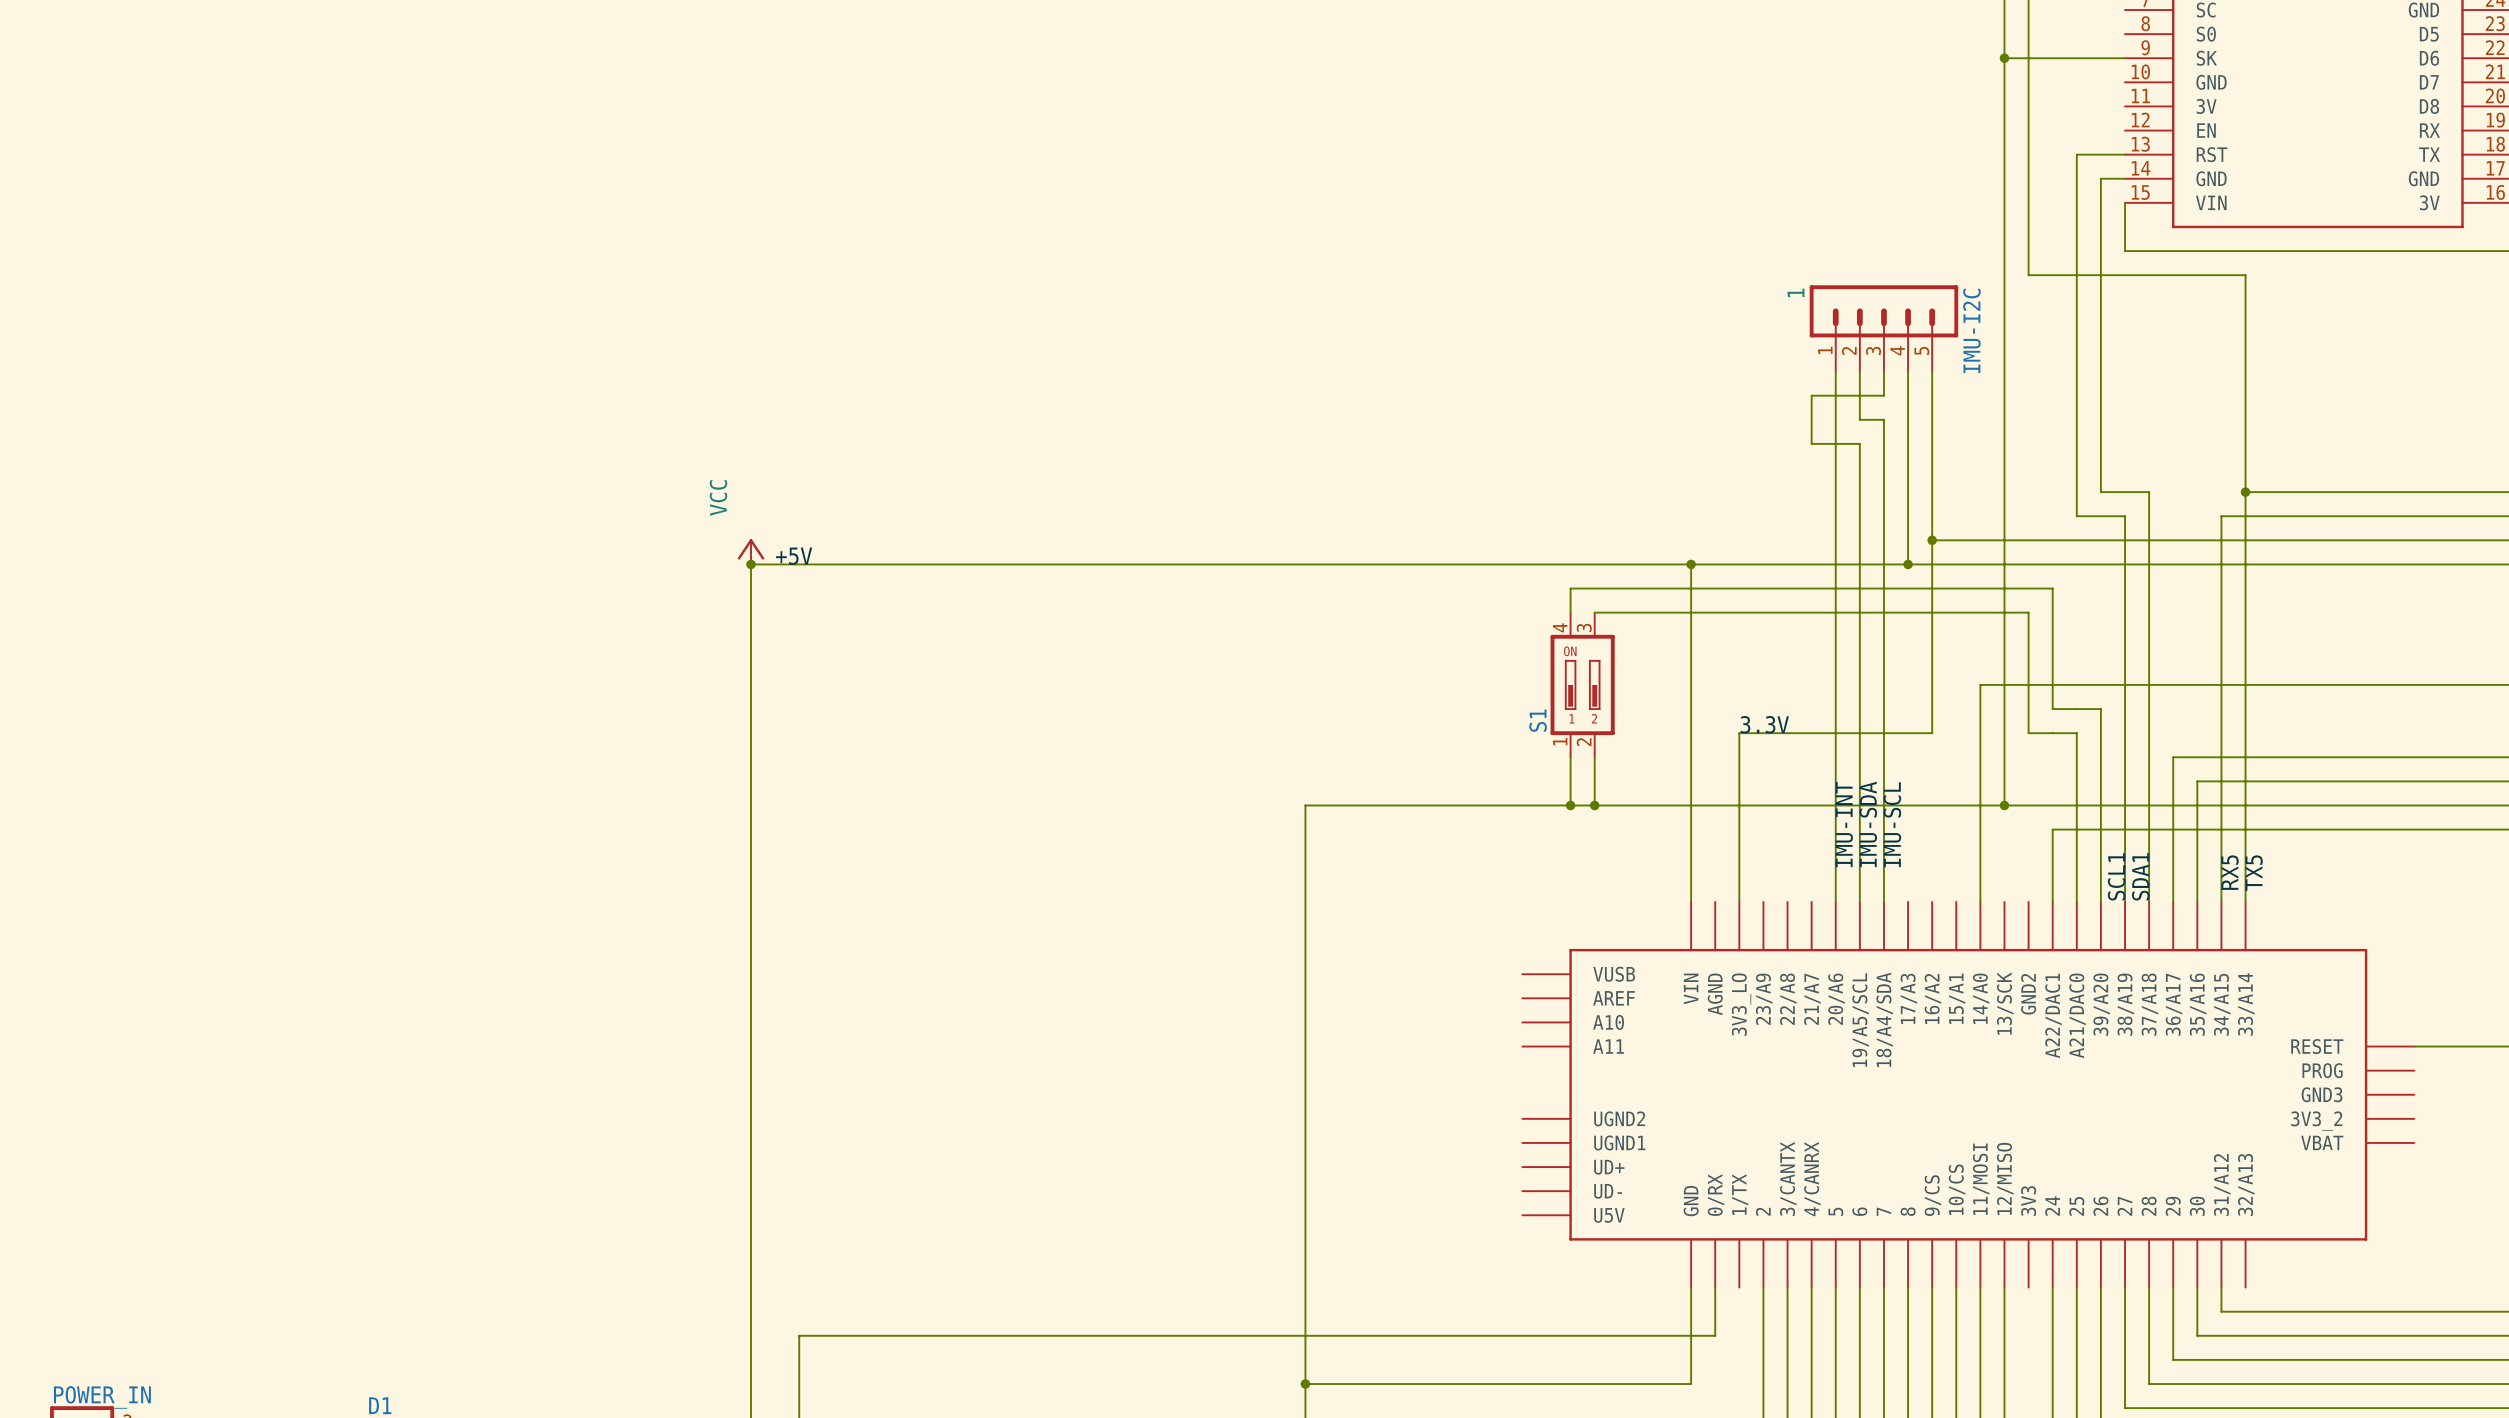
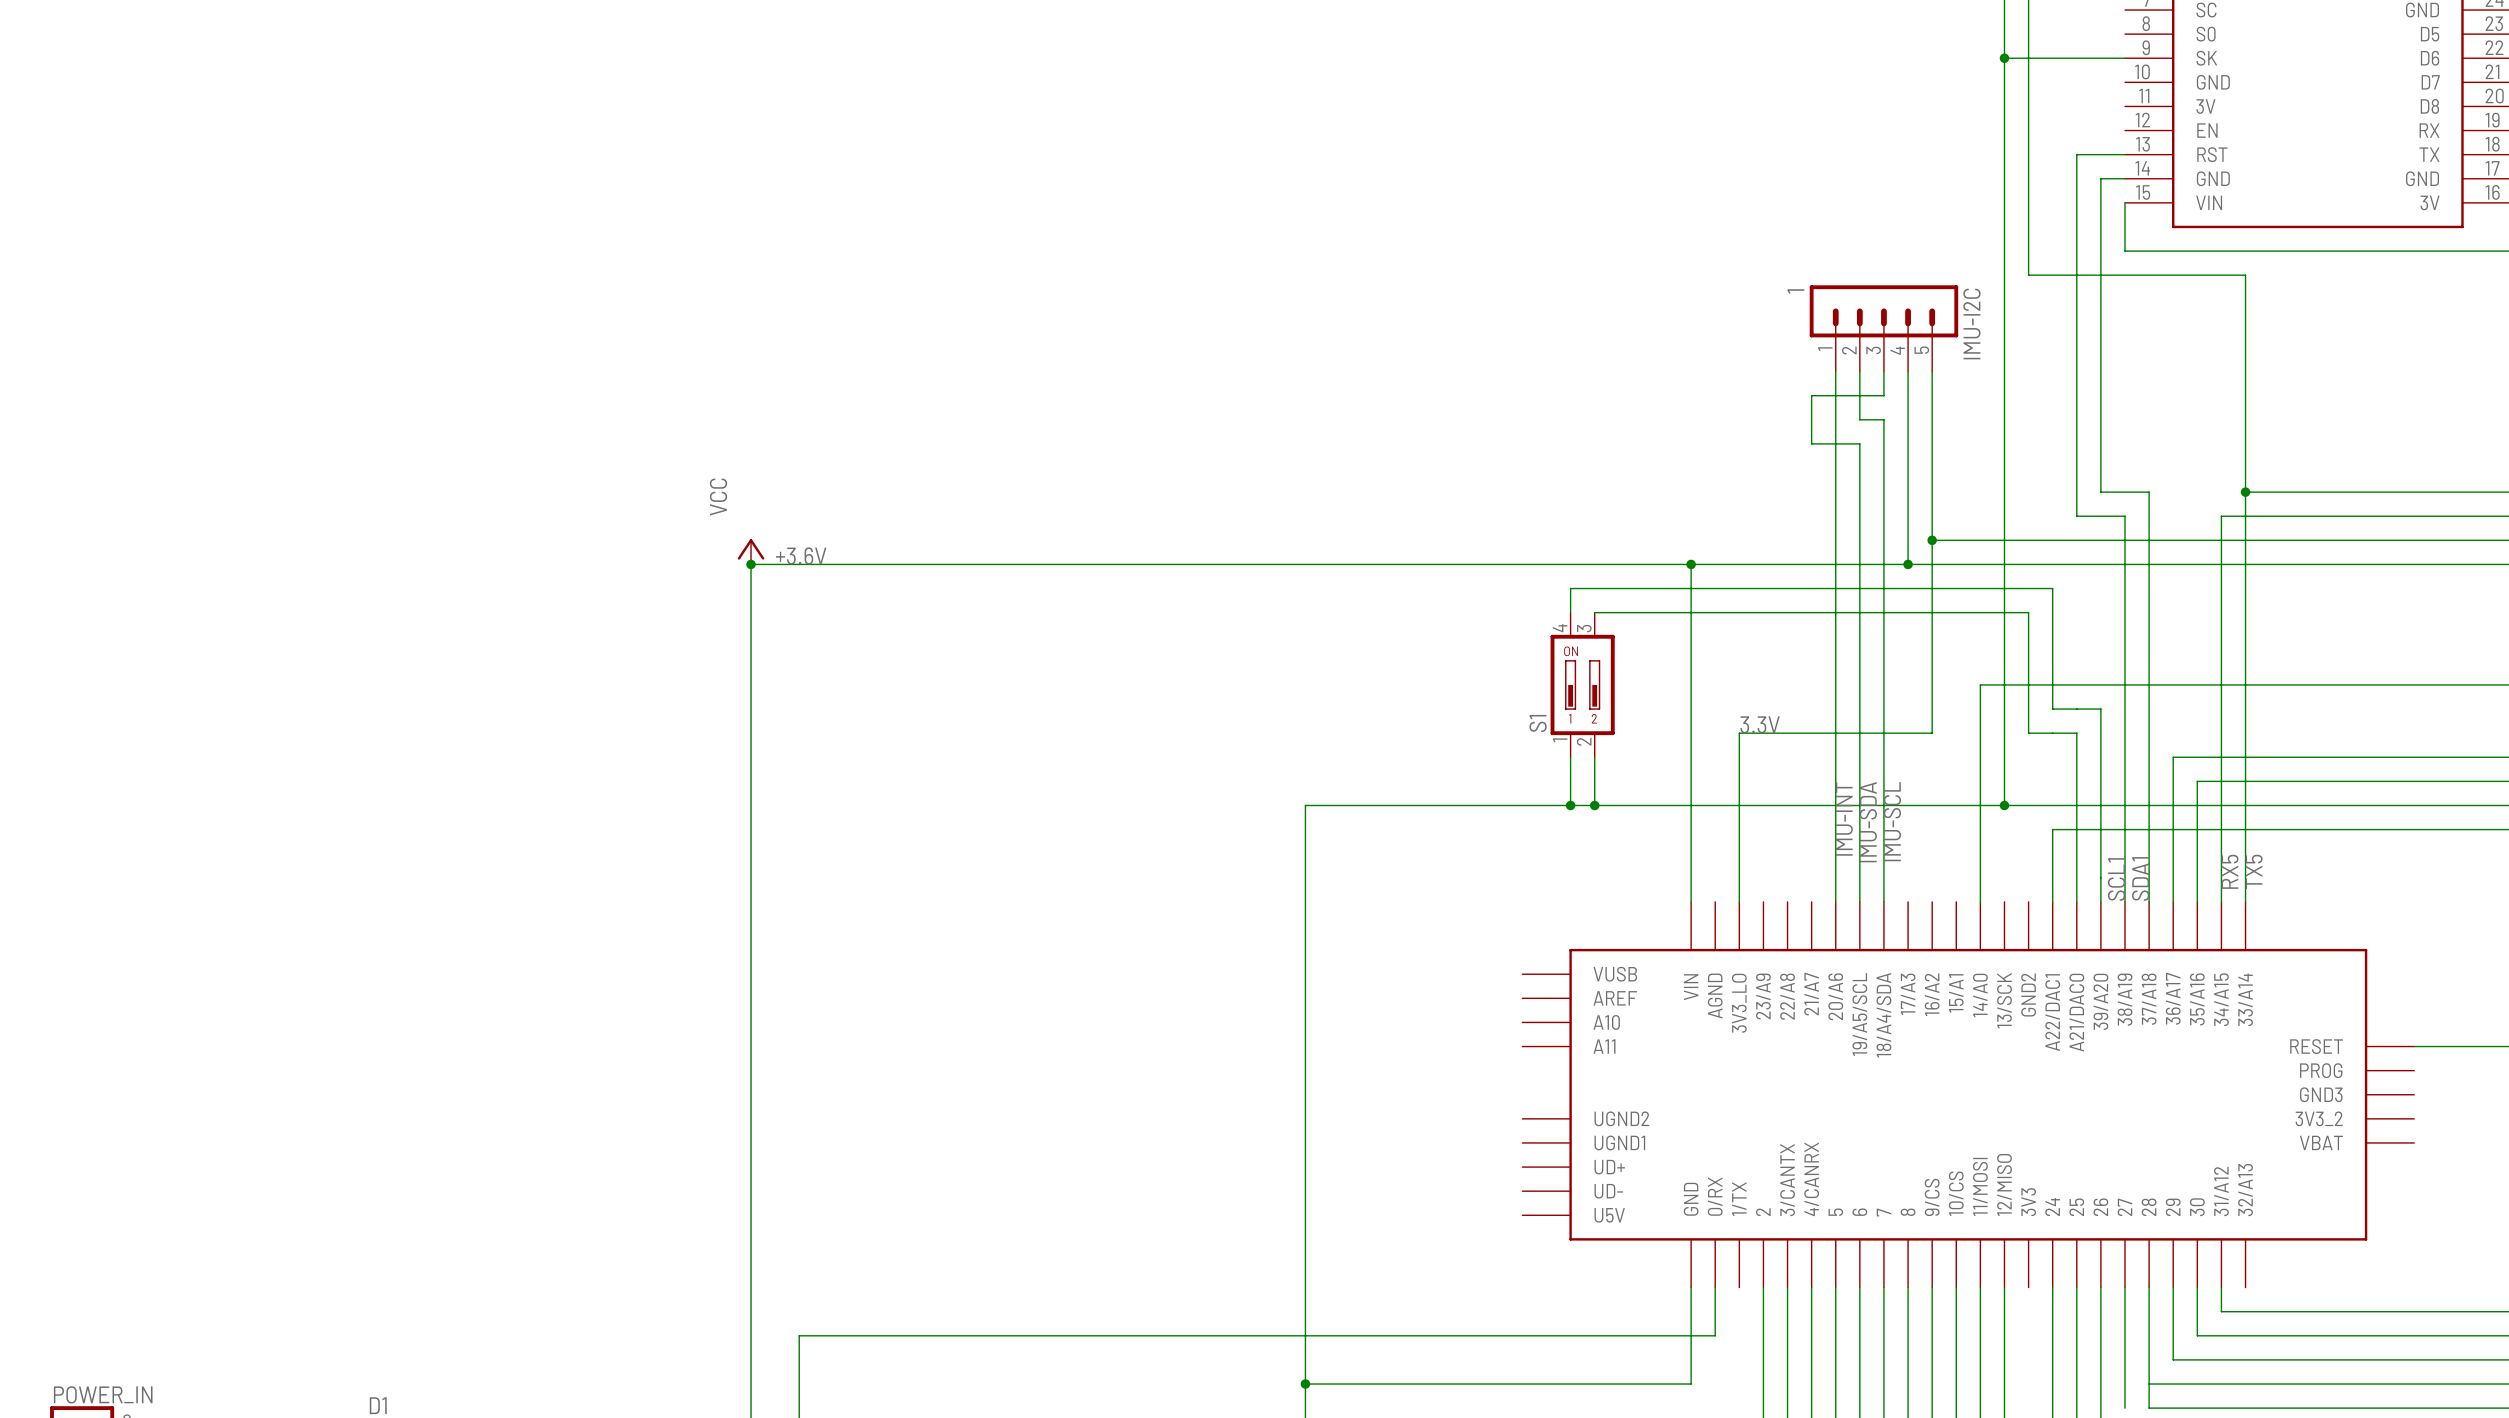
label: +5V (794, 556) -> +3.6V (801, 556)
wire: (2125, 1408) (2149, 1408) -> (2149, 1384) (2149, 1408)

